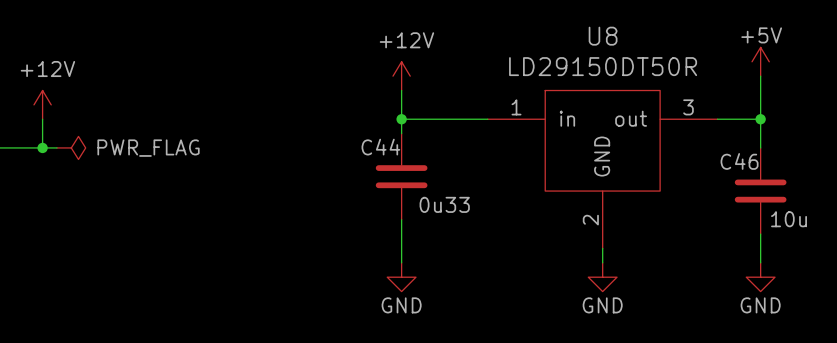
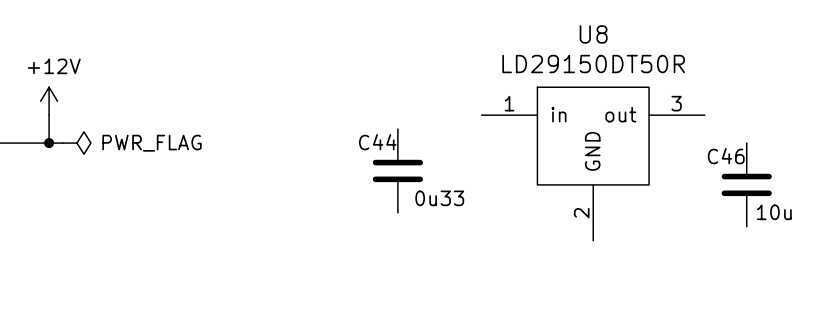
power symbol: +5V (760, 61) -> none
power symbol: +12V (401, 76) -> none
wire: (760, 76) (760, 147) -> none
wire: (401, 90) (401, 133) -> none
wire: (401, 119) (487, 119) -> none
junction: (401, 119) -> none
wire: (717, 119) (760, 119) -> none
junction: (760, 119) -> none
wire: (401, 219) (401, 262) -> none
wire: (760, 234) (760, 262) -> none
wire: (602, 248) (602, 262) -> none
power symbol: GND (401, 277) -> none
power symbol: GND (602, 277) -> none
power symbol: GND (760, 277) -> none

